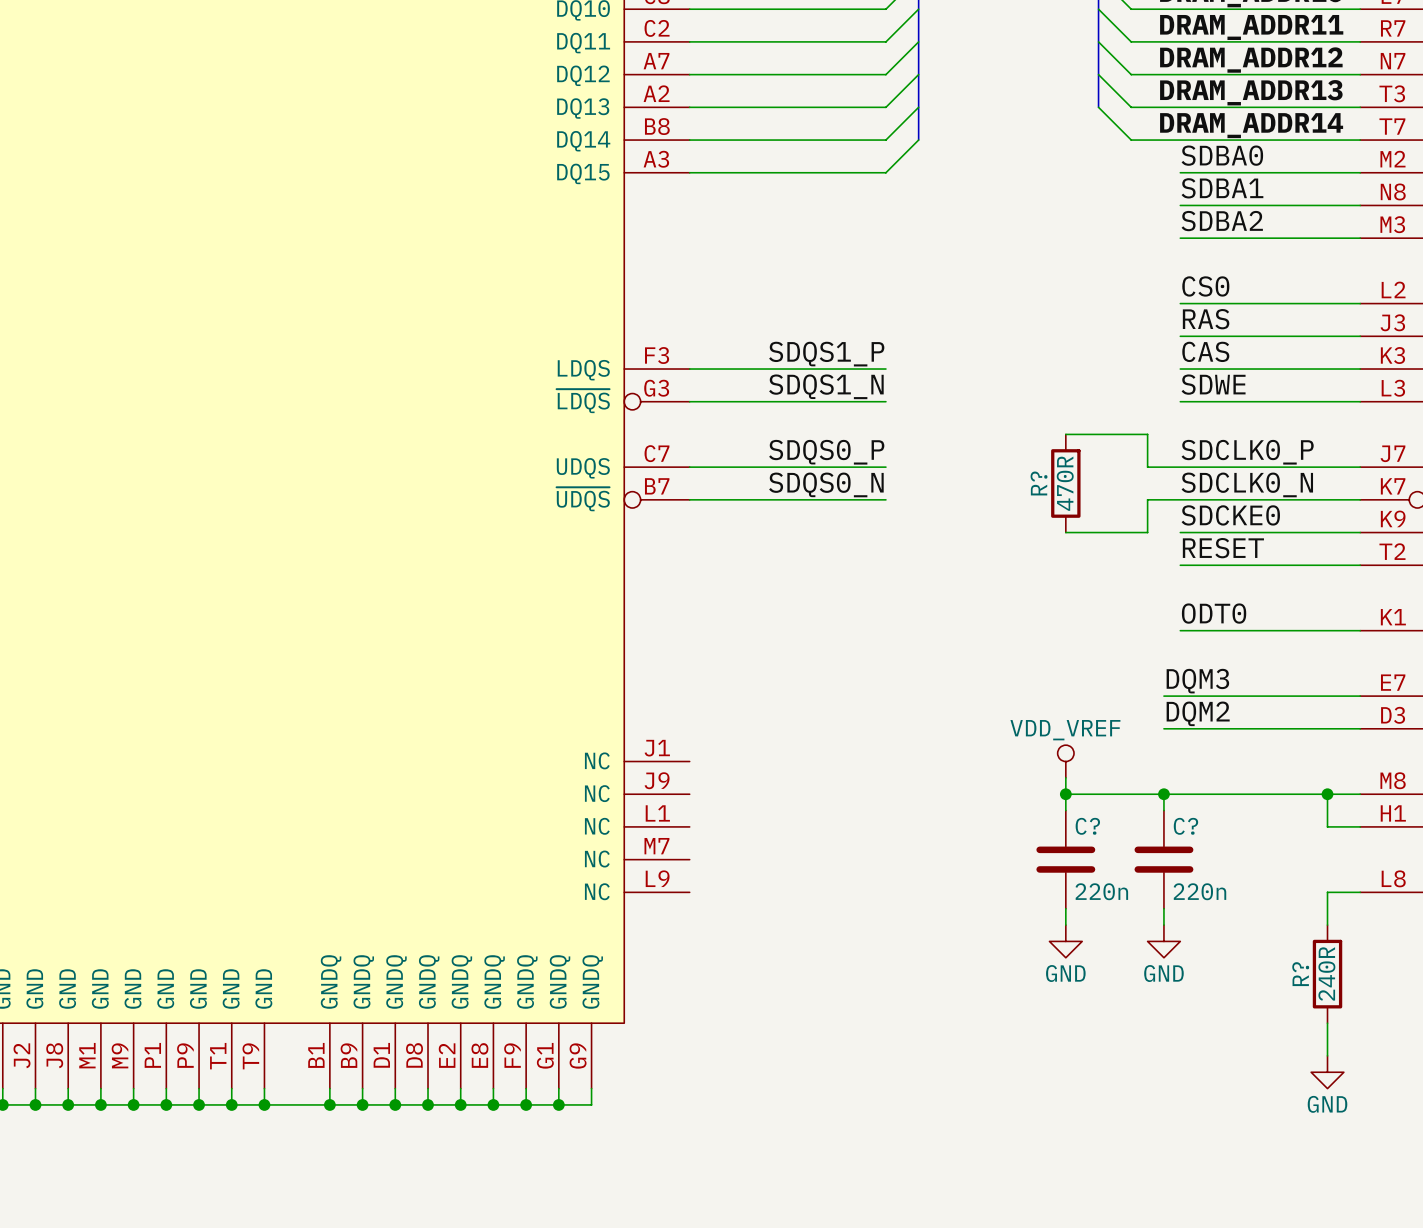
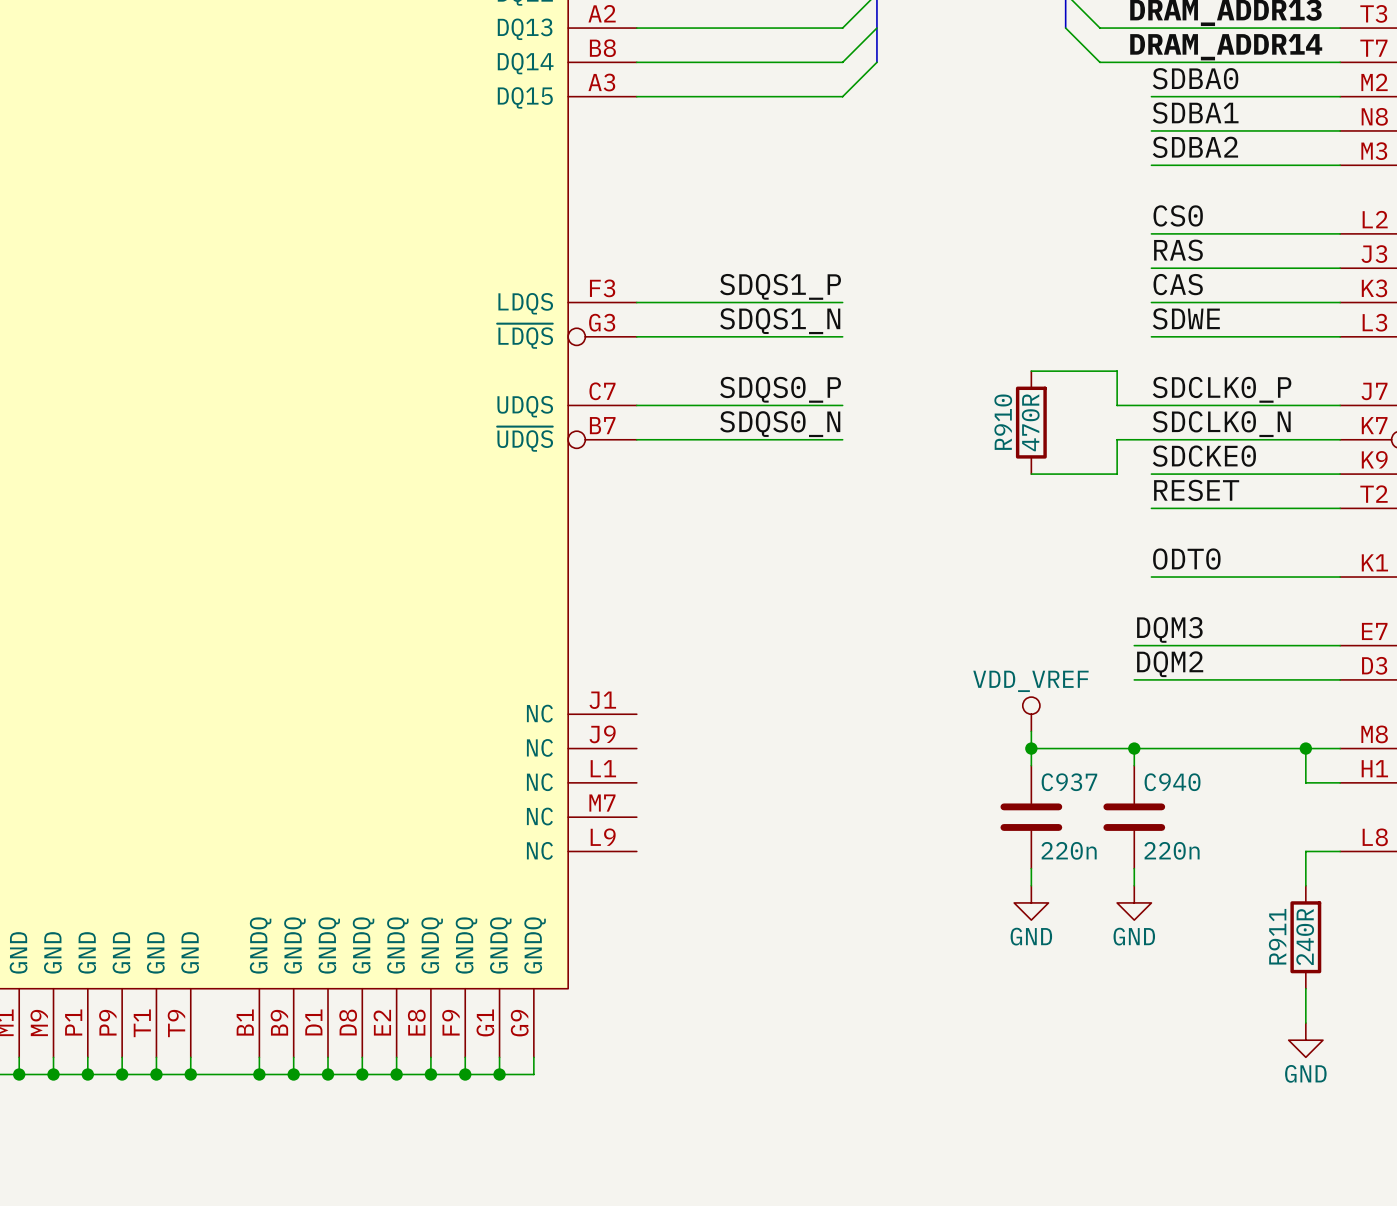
R? name: R? (1039, 483) -> R910 (1003, 422)
C? name: C? (1087, 826) -> C937 (1069, 782)
C? name: C? (1185, 826) -> C940 (1172, 782)
R? name: R? (1300, 974) -> R911 (1277, 936)

